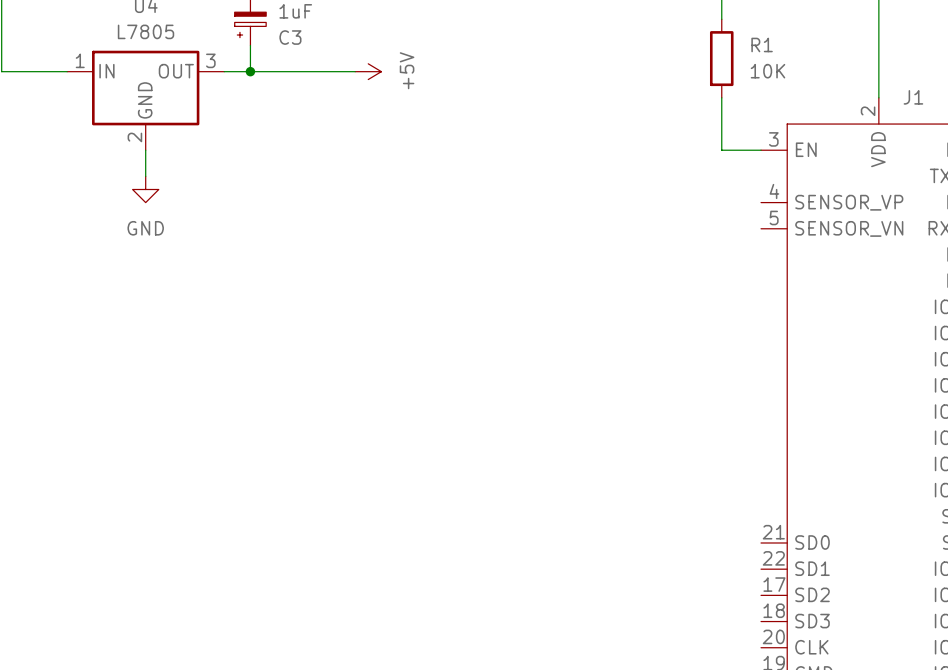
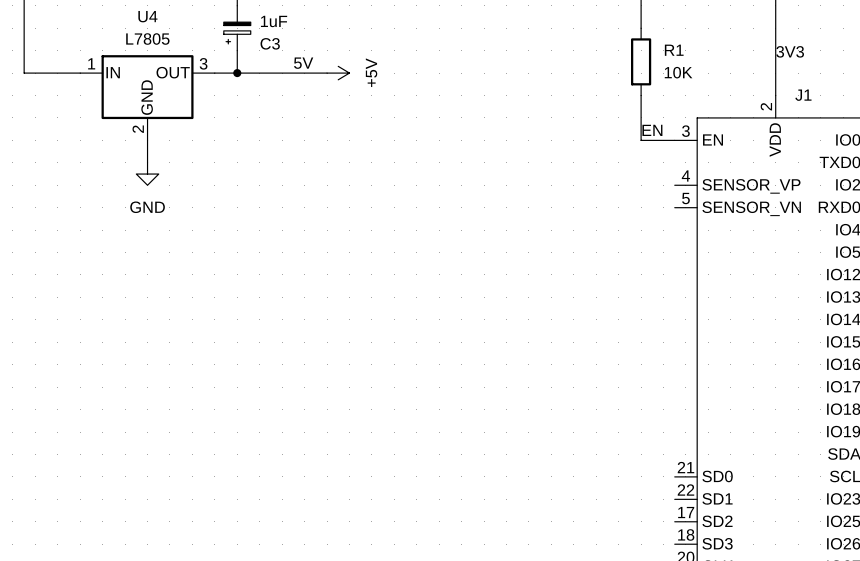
label: none -> 3V3 (790, 51)
label: none -> 5V (303, 63)
label: none -> EN (652, 130)

